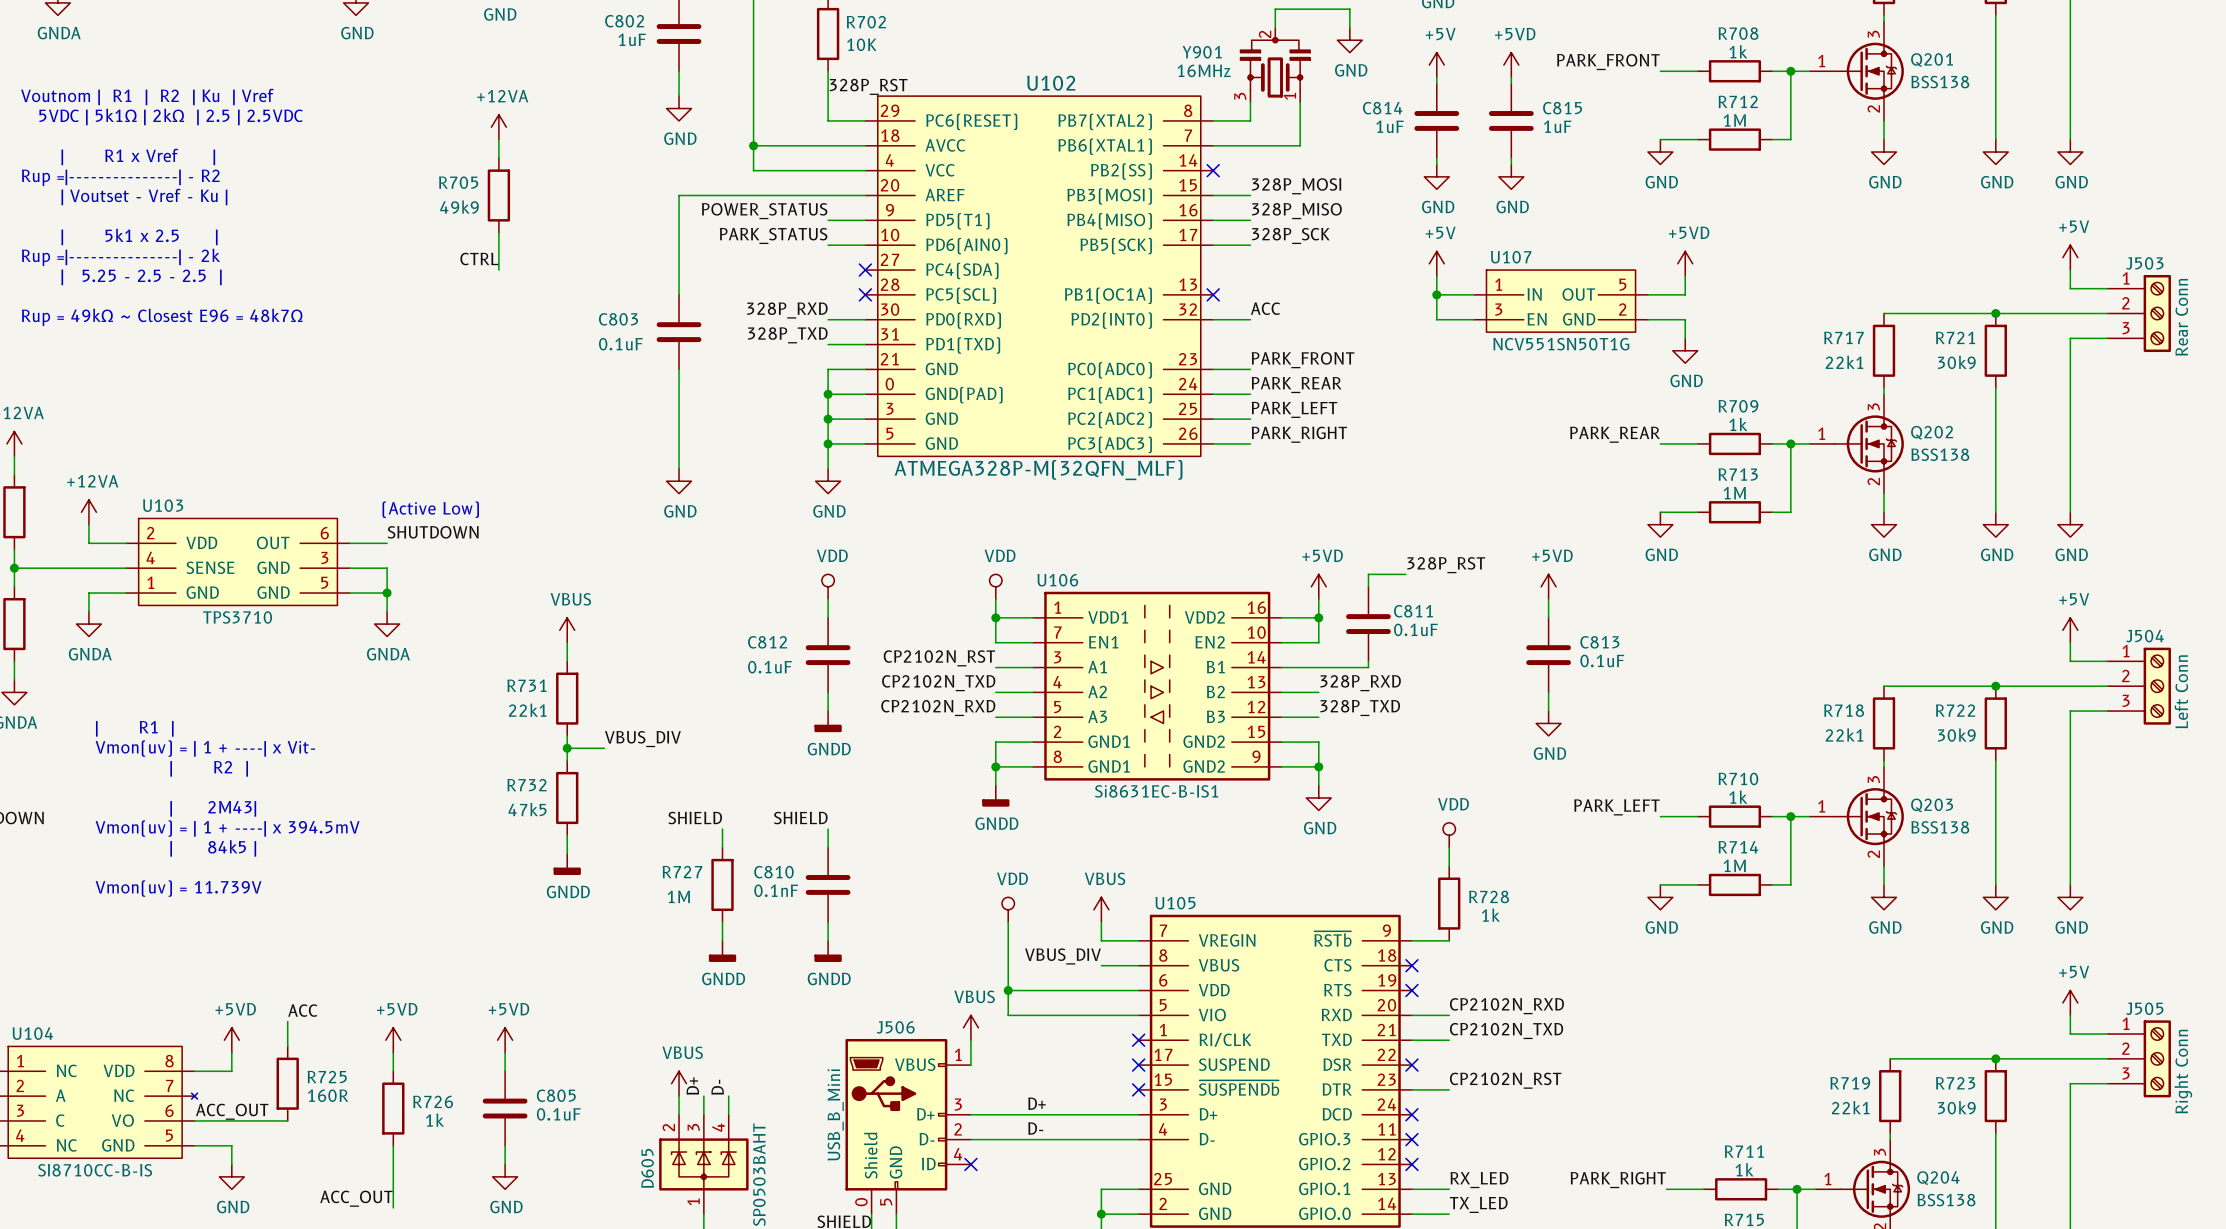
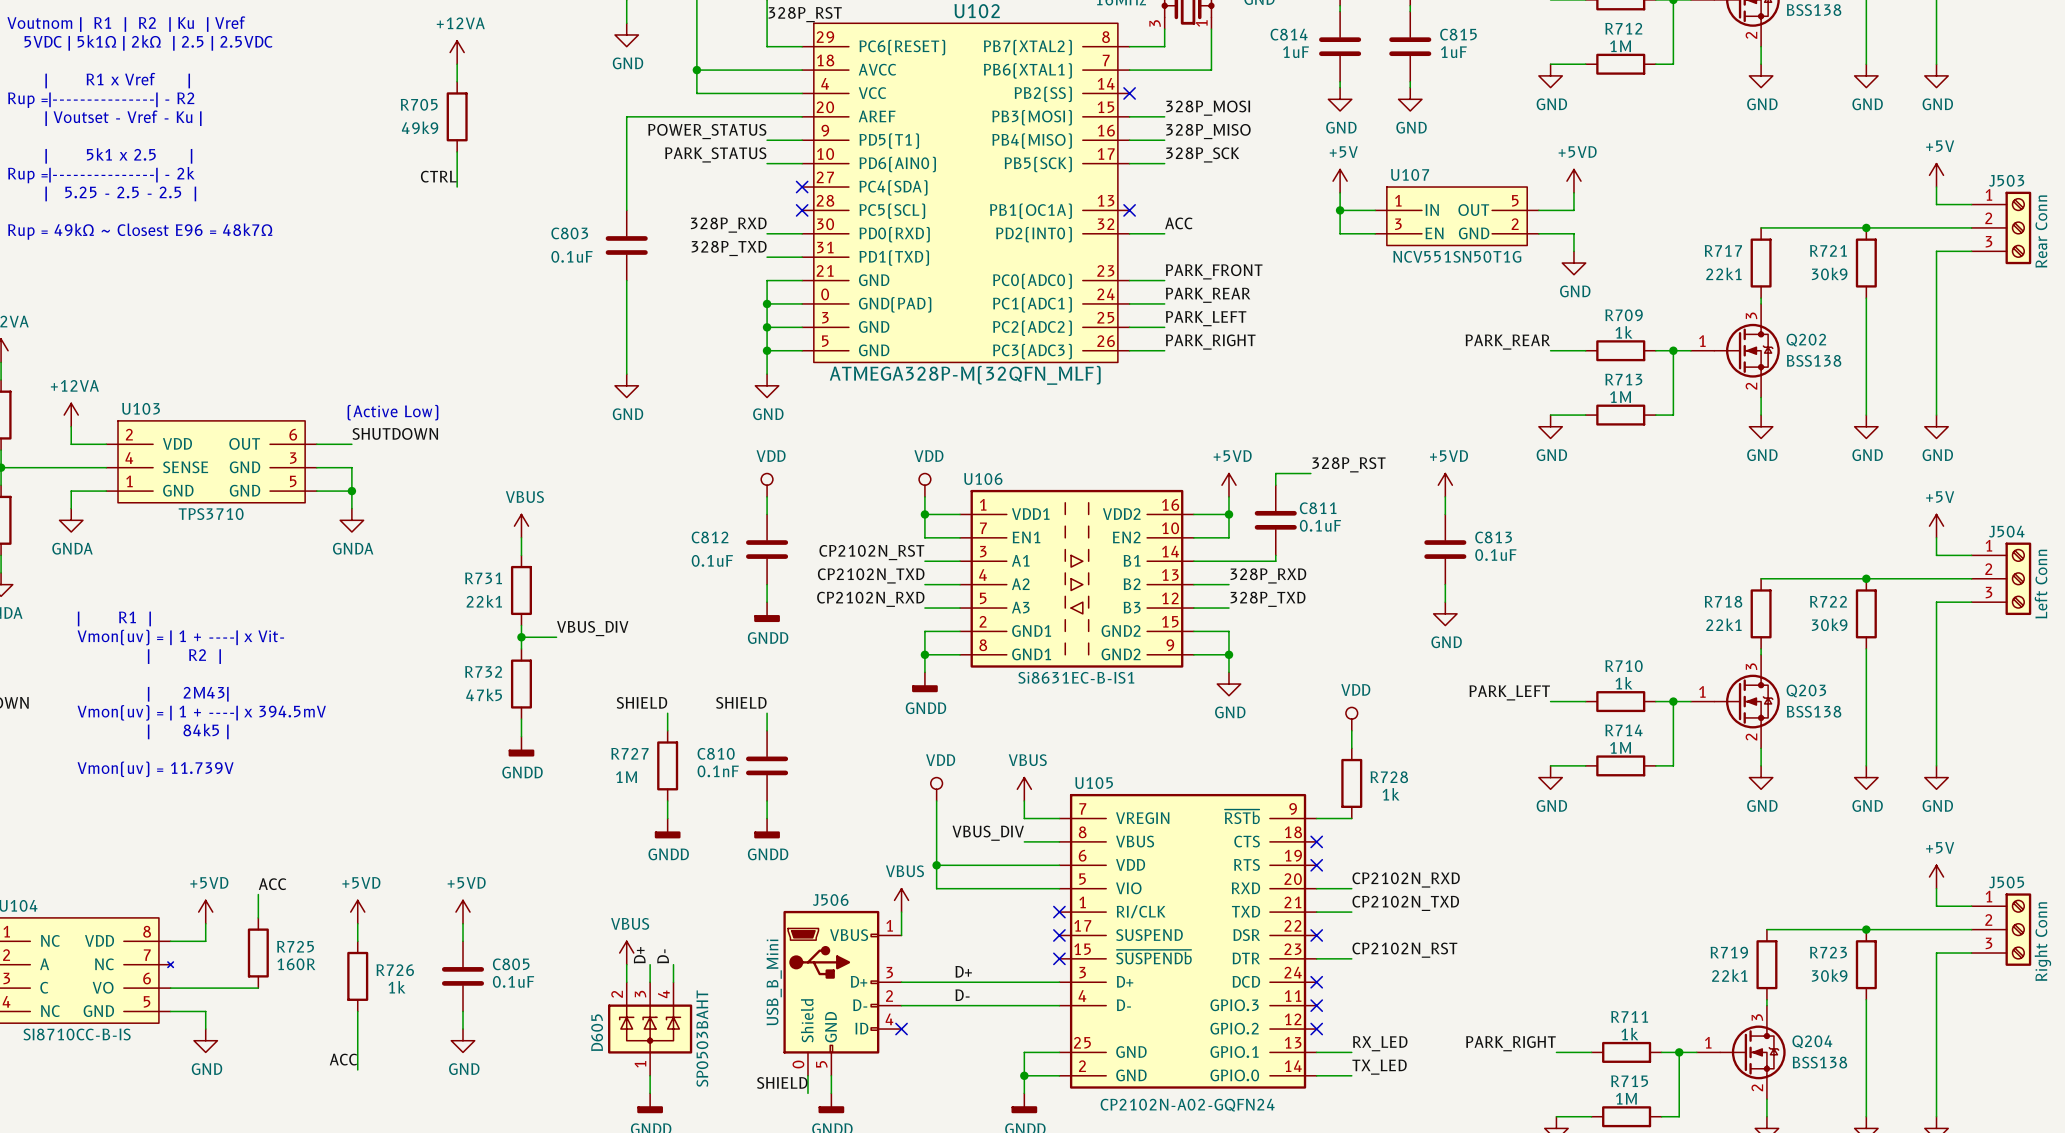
label: ACC_OUT (232, 1111) -> none
label: ACC_OUT (356, 1198) -> ACC (343, 1059)

